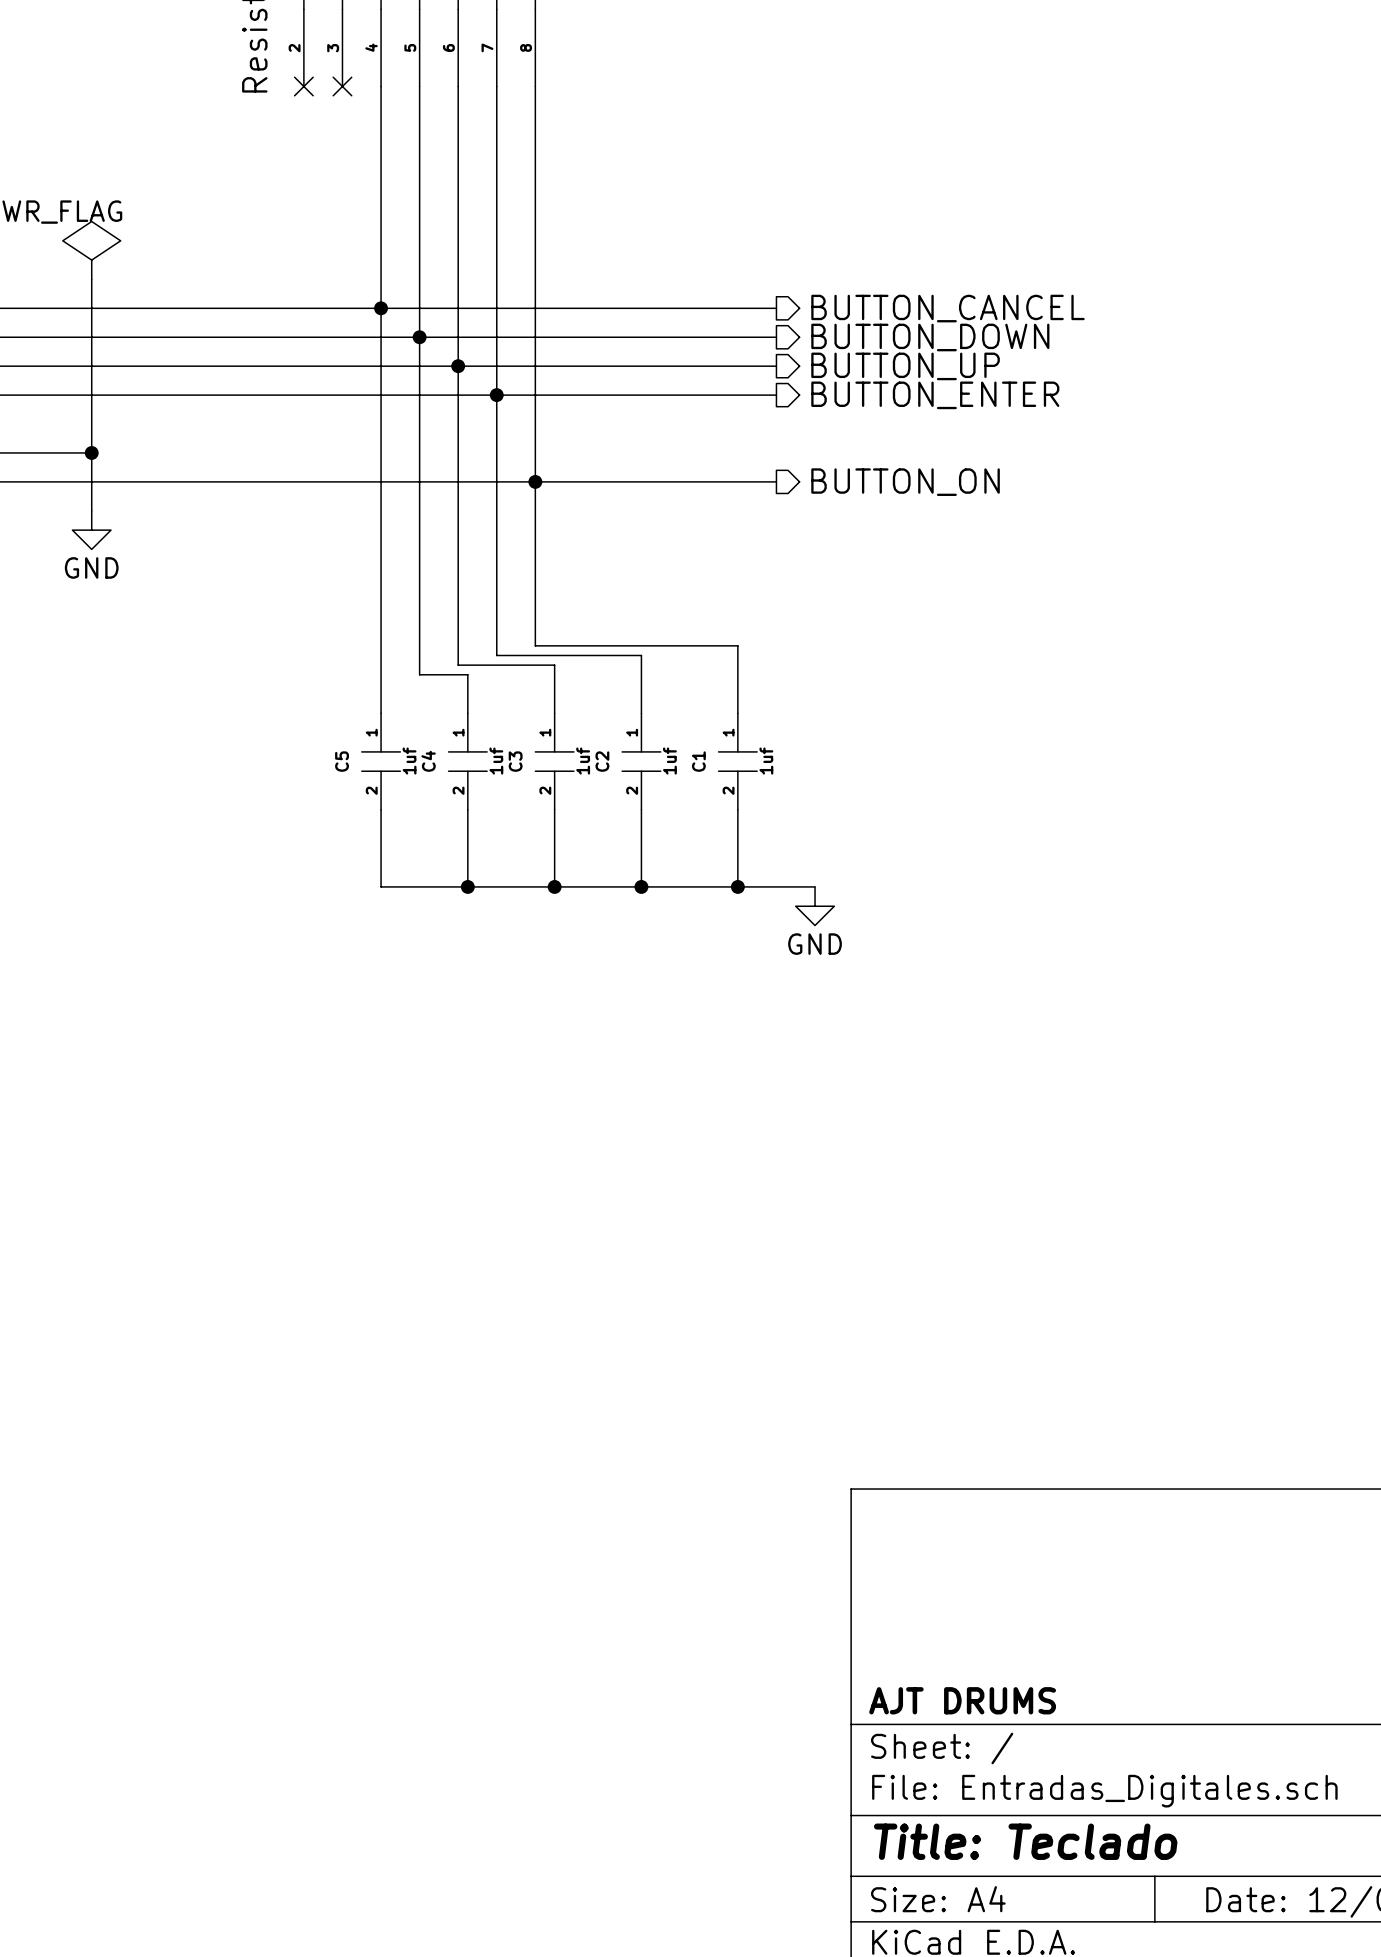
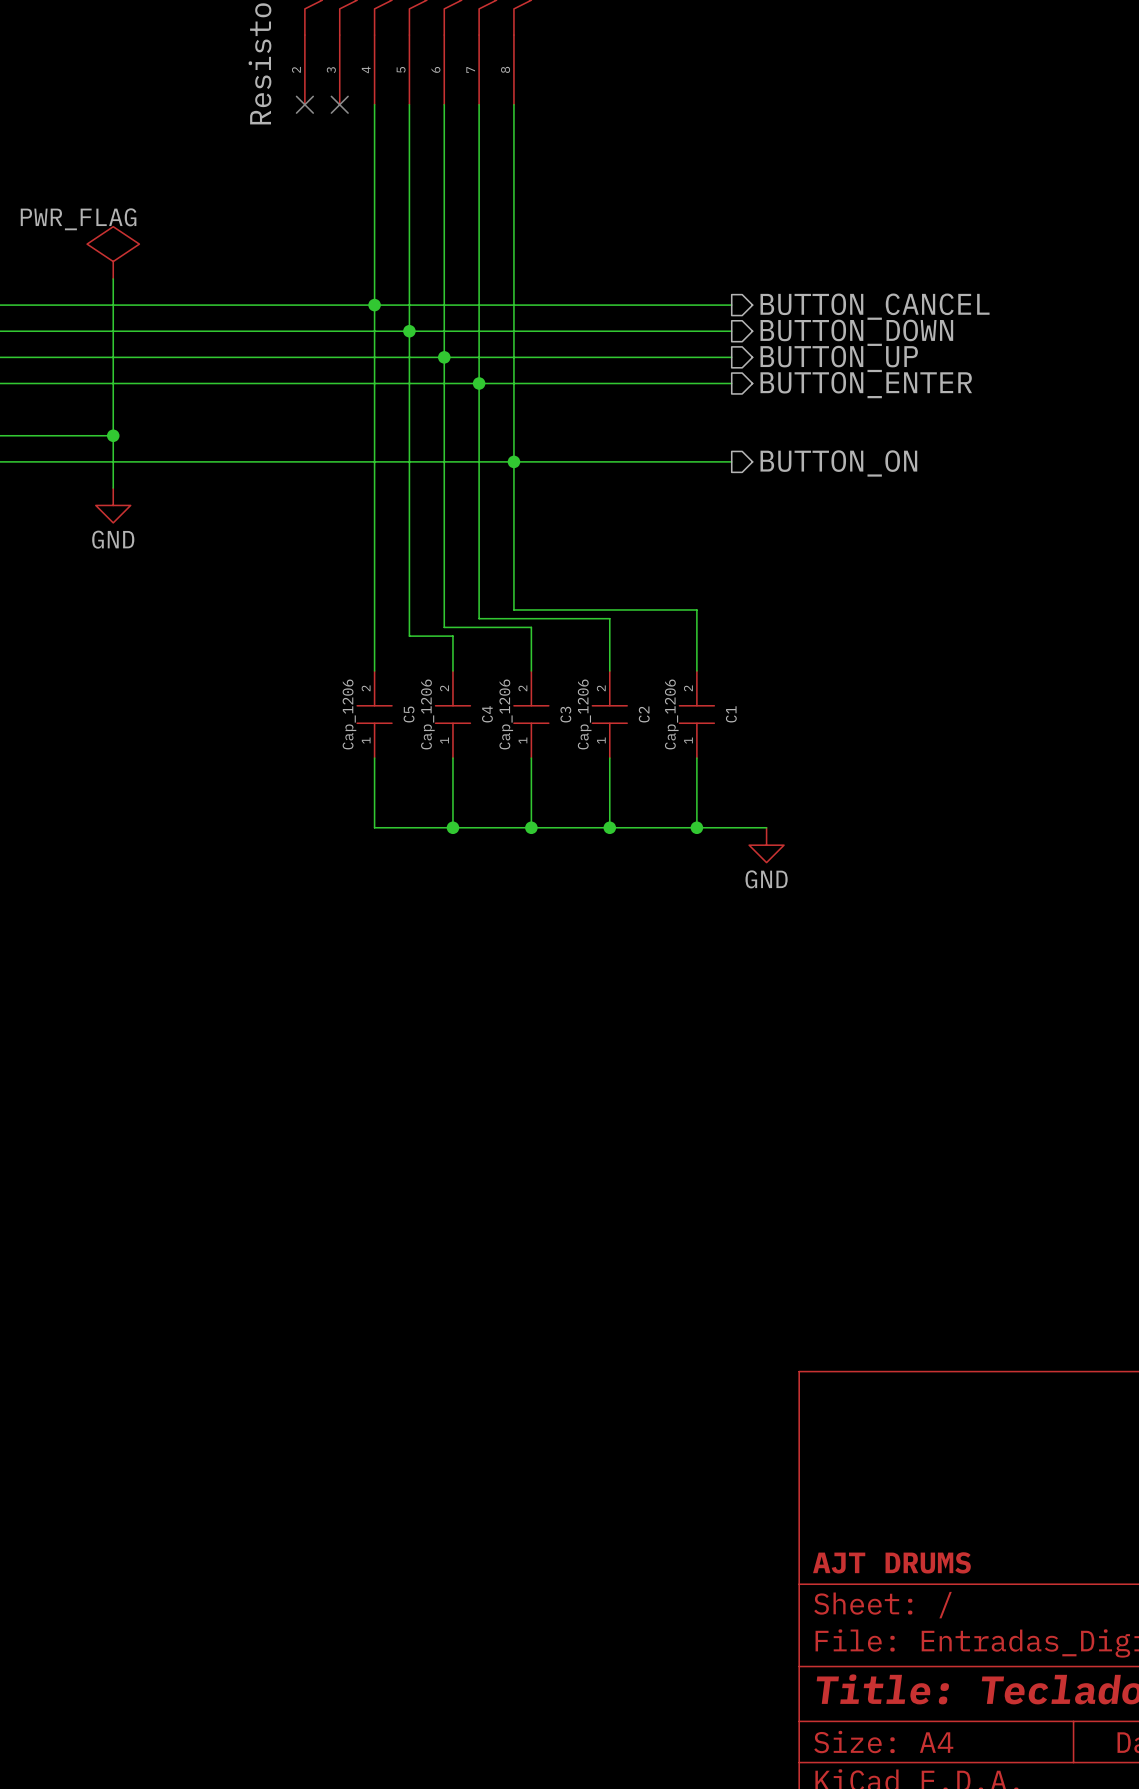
C5 rotation: 0° (381, 761) -> 180° (374, 714)
C5 value: 1uf (409, 761) -> Cap_1206 (349, 714)
C4 rotation: 0° (467, 761) -> 180° (452, 714)
C4 value: 1uf (496, 761) -> Cap_1206 (427, 714)
C3 rotation: 0° (554, 761) -> 180° (531, 714)
C3 value: 1uf (583, 761) -> Cap_1206 (506, 714)
C2 rotation: 0° (641, 761) -> 180° (609, 714)
C2 value: 1uf (669, 761) -> Cap_1206 (584, 714)
C1 rotation: 0° (737, 761) -> 180° (696, 714)
C1 value: 1uf (766, 761) -> Cap_1206 (671, 714)

